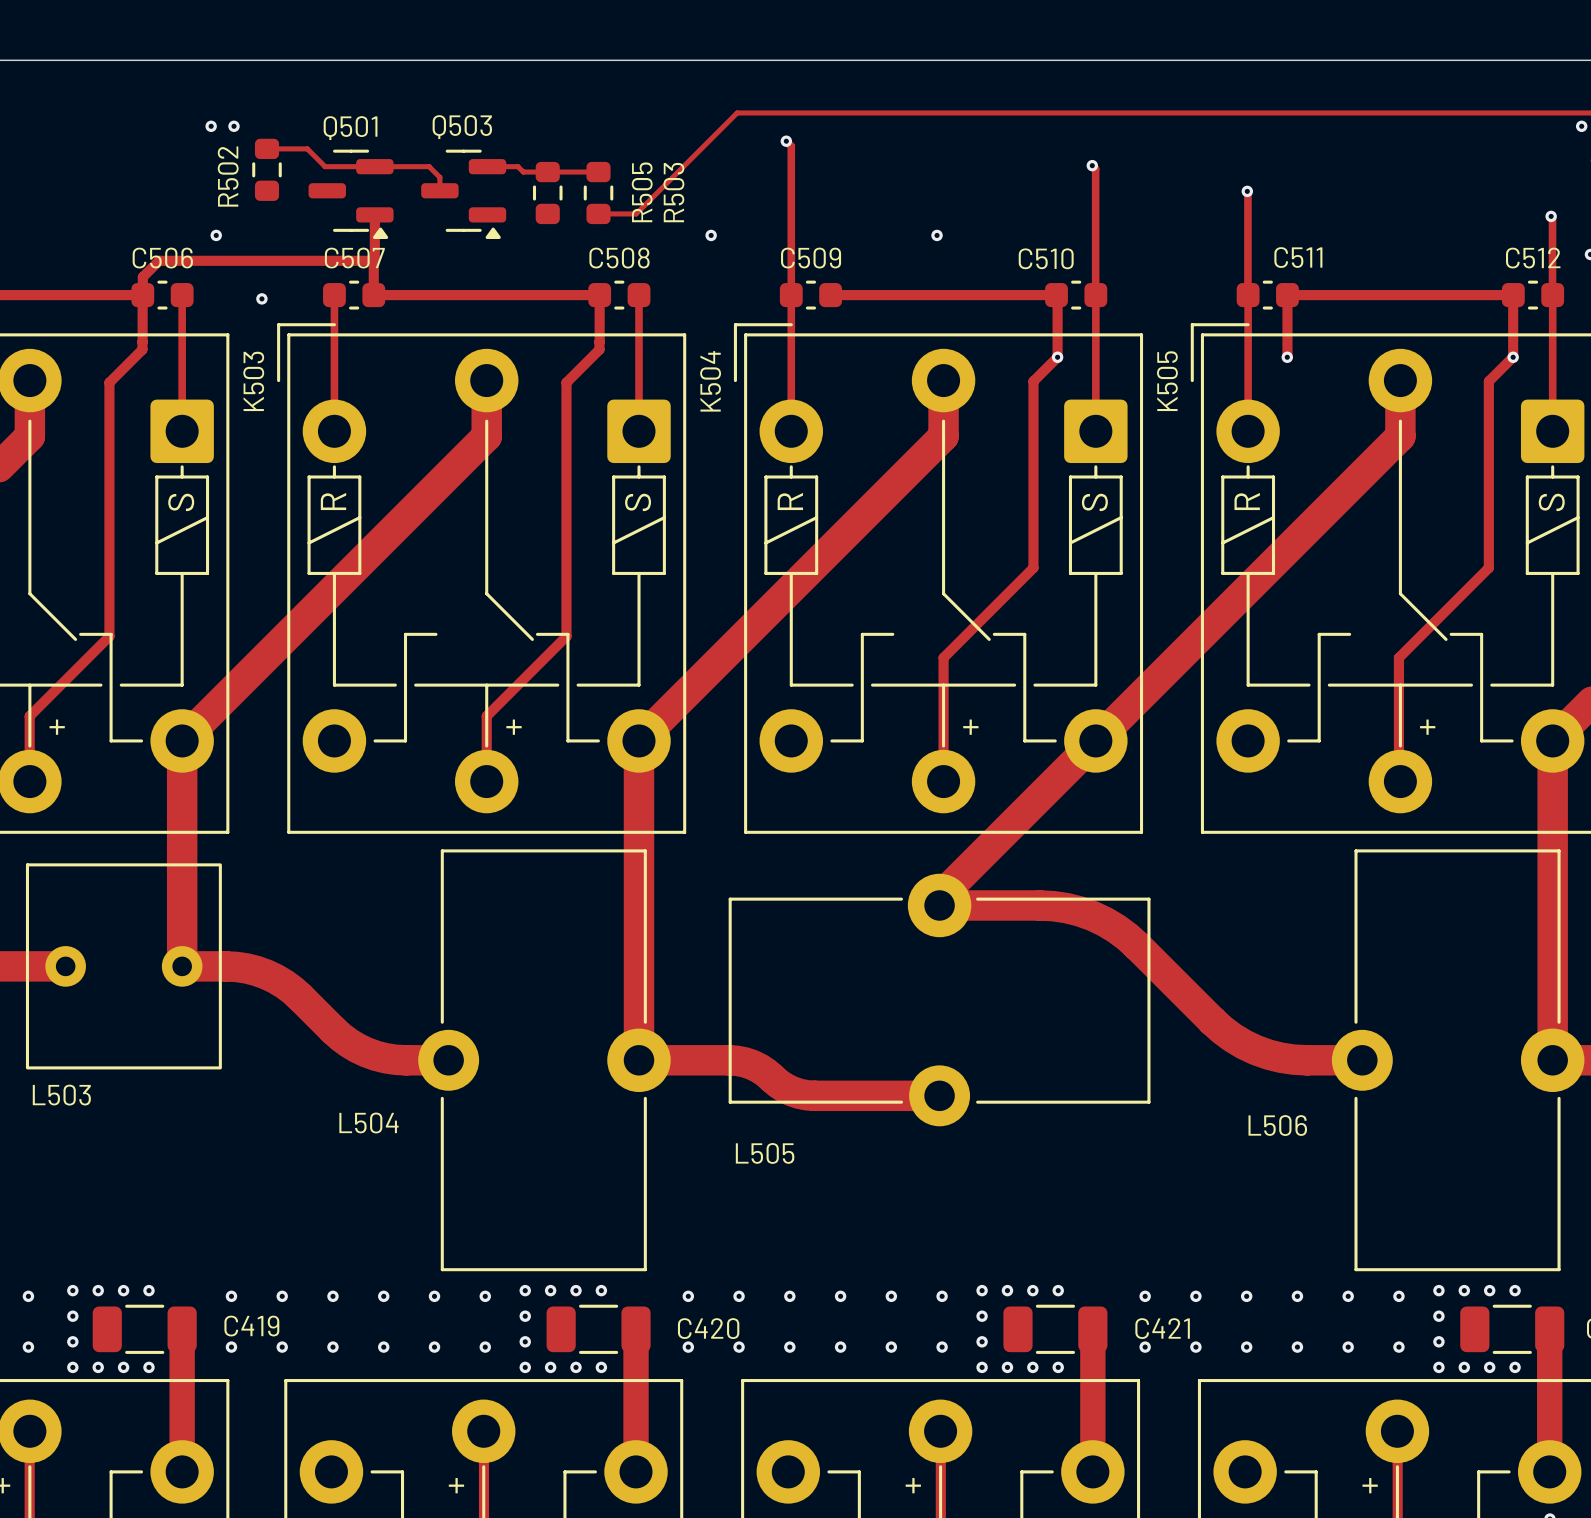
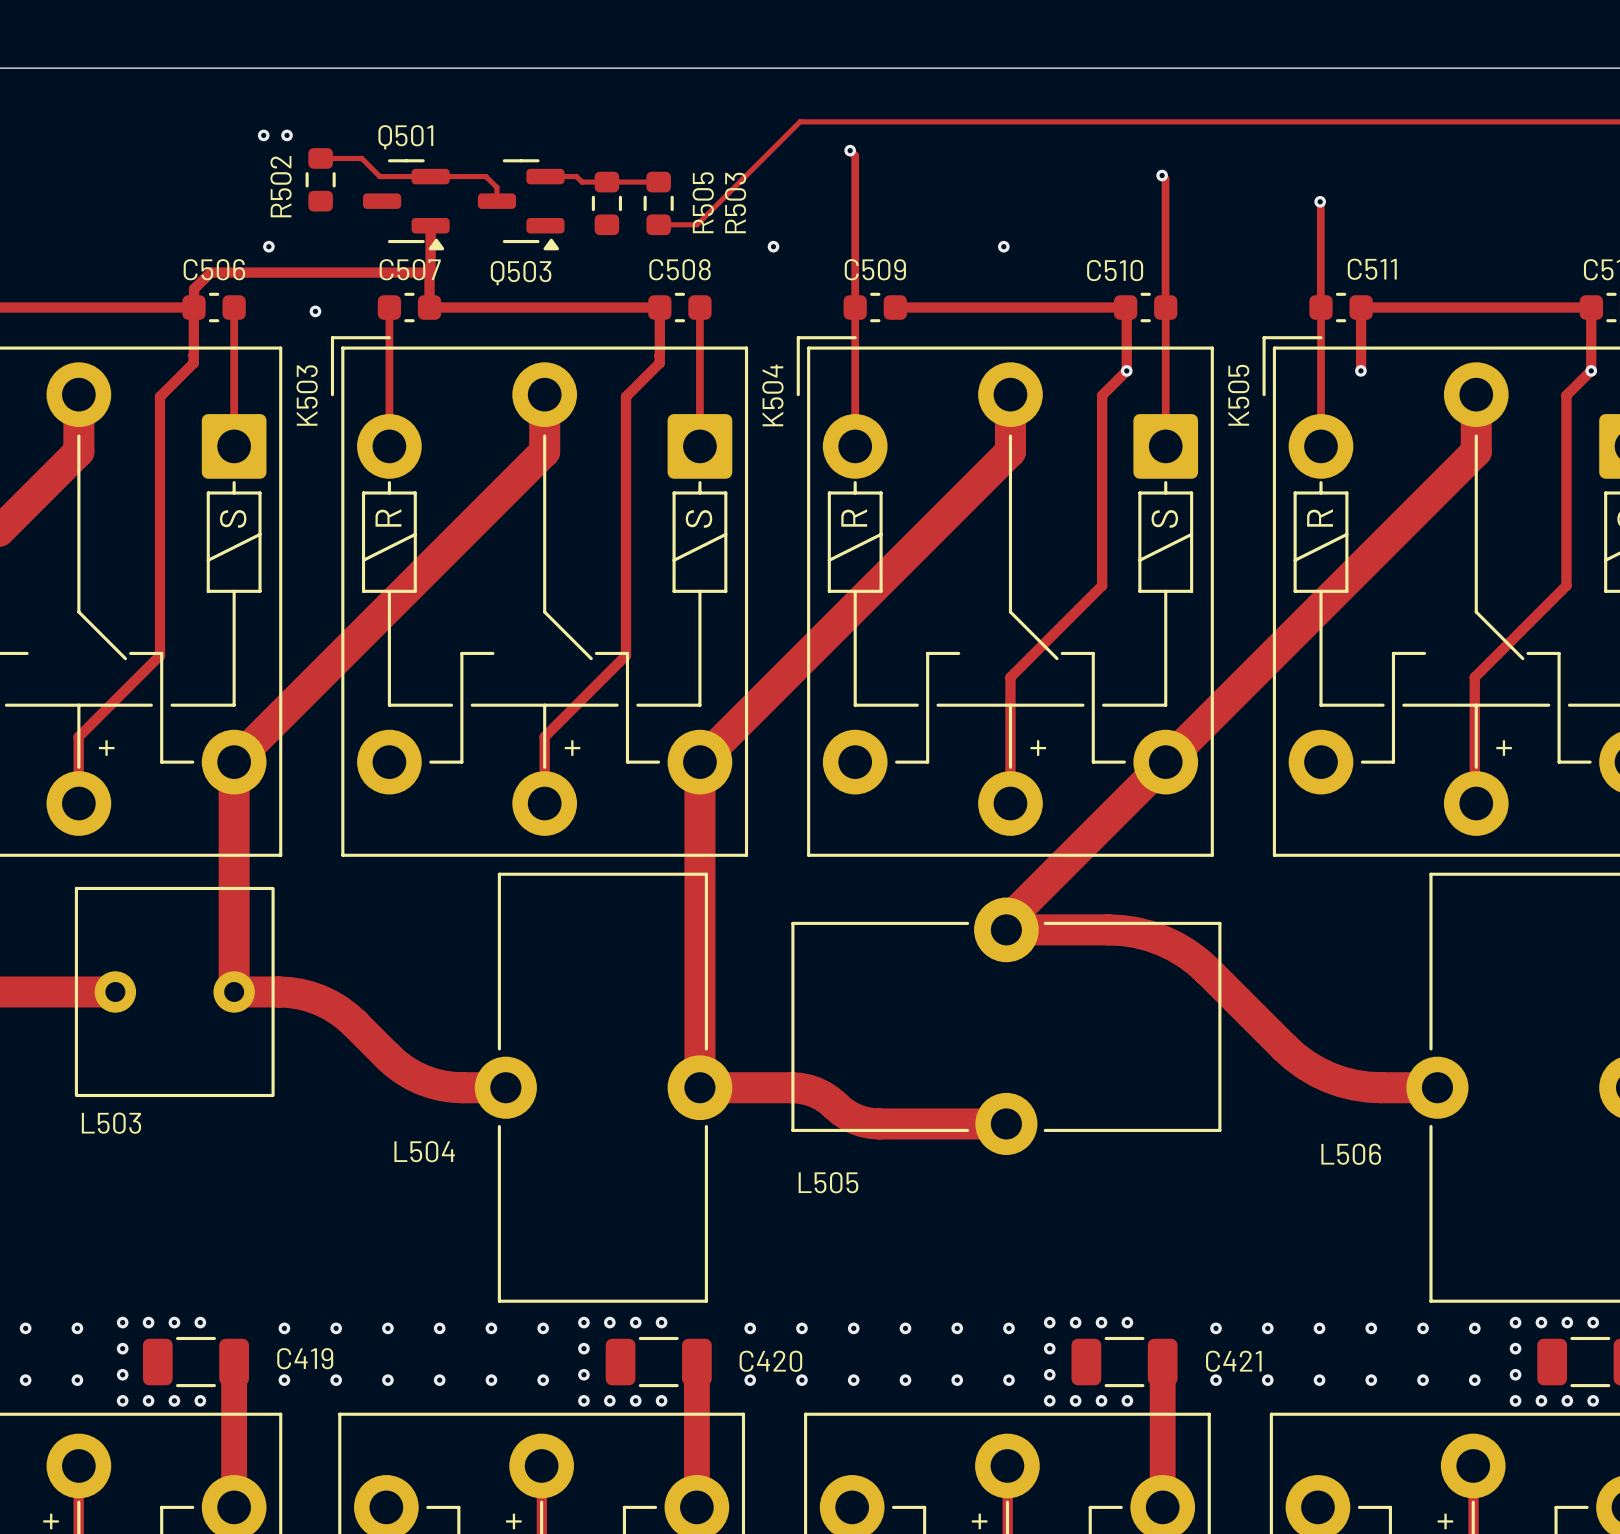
Q503 name position: Q503 (462, 127) -> Q503 (521, 273)

